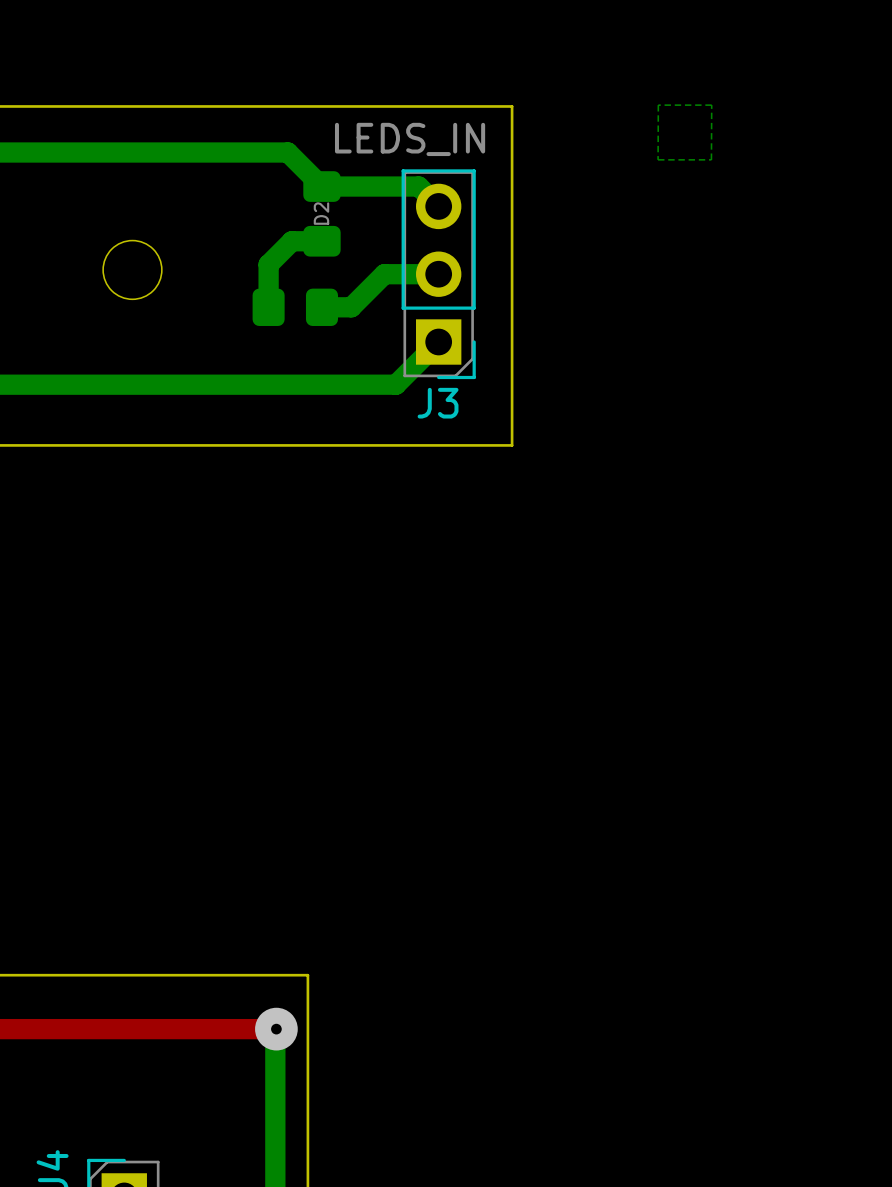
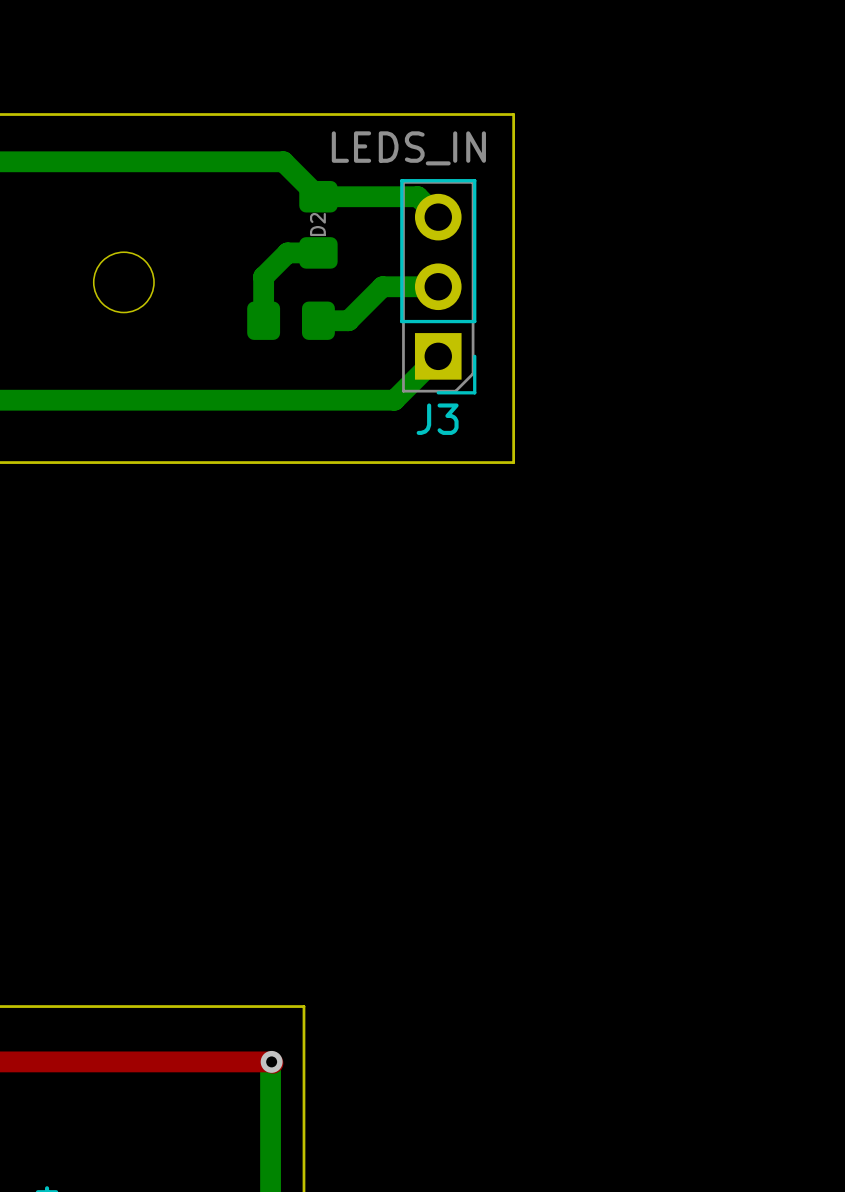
bottom zone outline: (658, 105) (711, 105) (711, 159) (658, 159) (658, 105) -> none
via size: [255, 1007, 298, 1051] -> [260, 1050, 283, 1073]

